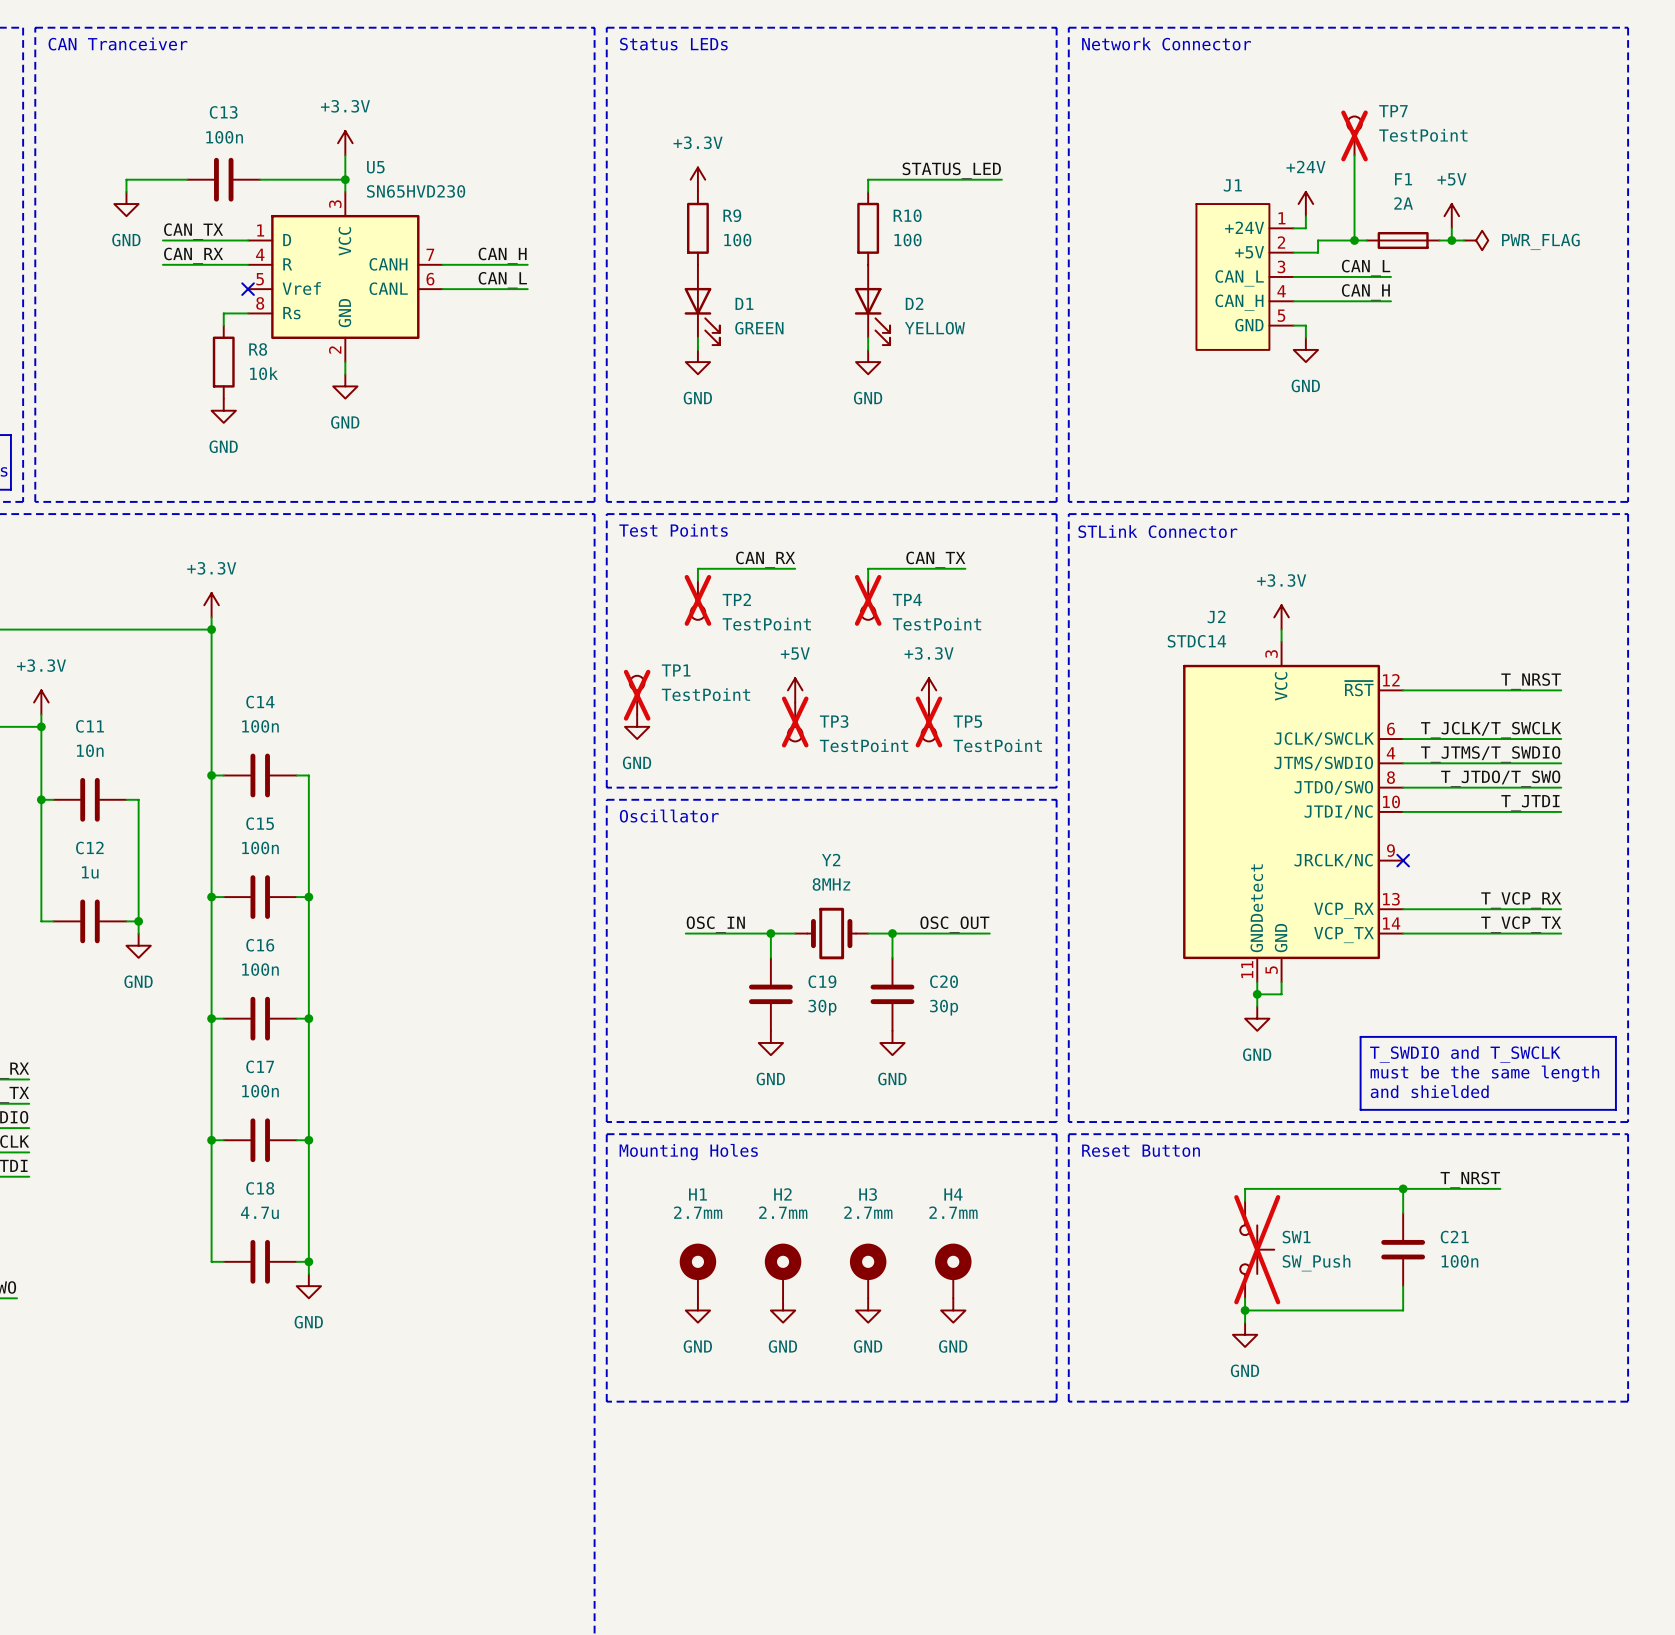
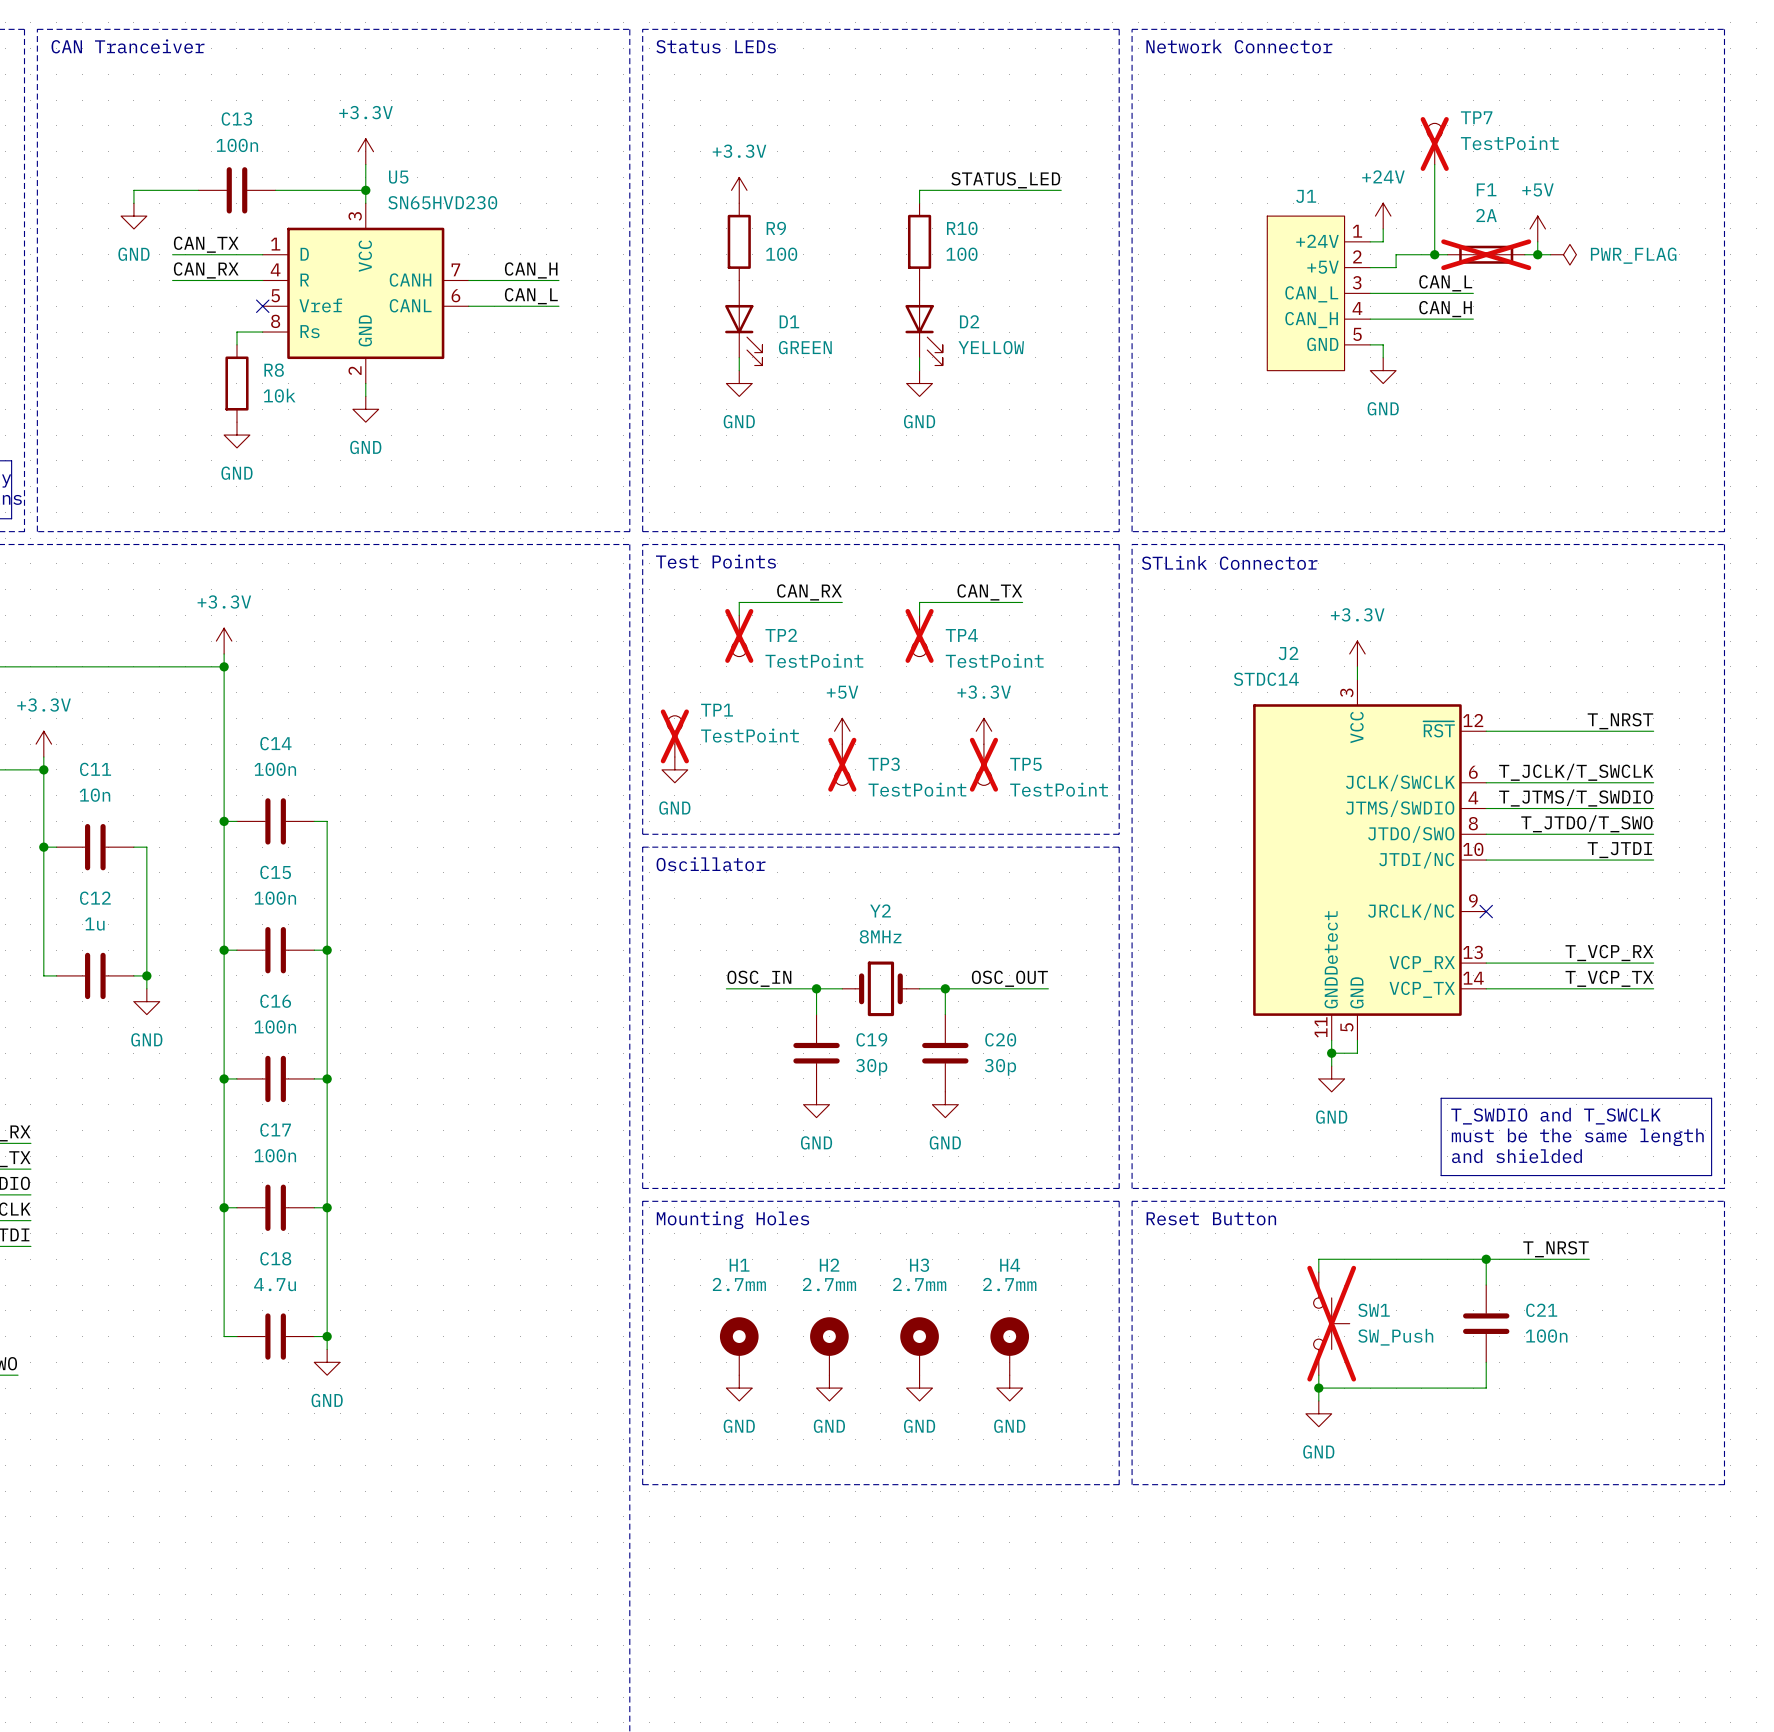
F1 do-not-place cross: none -> (1486, 254)

